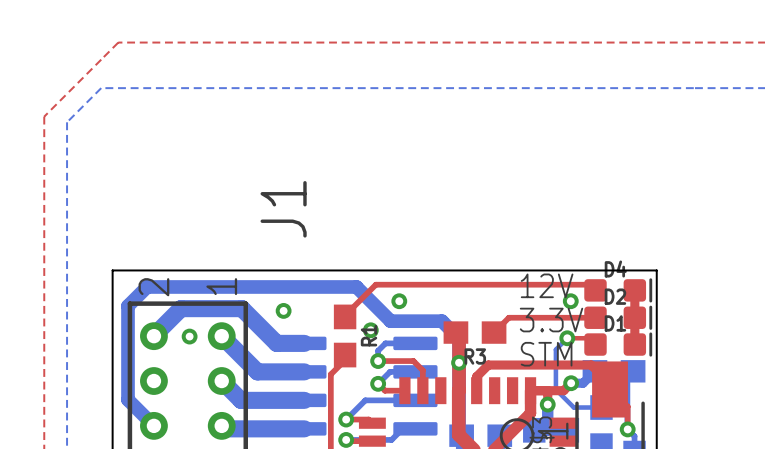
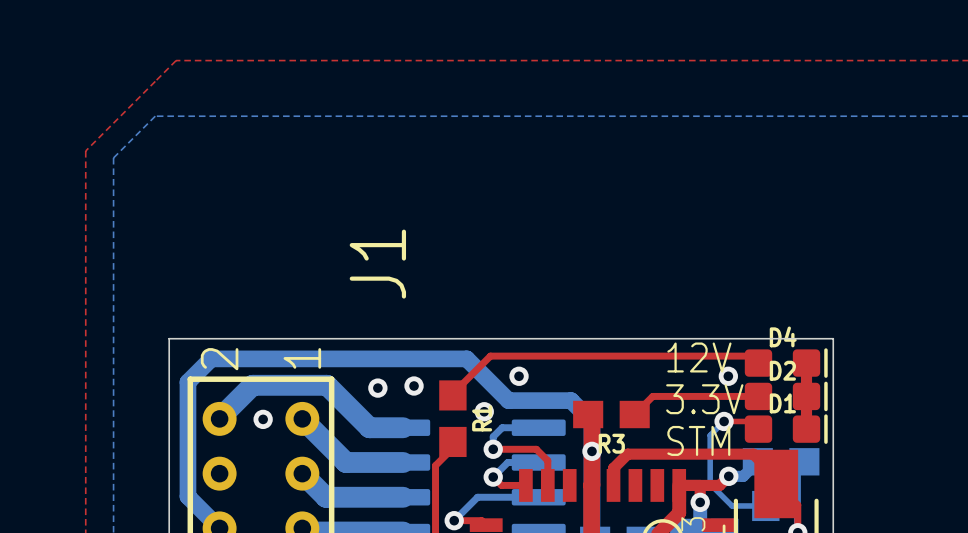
via: none -> (414, 386)

